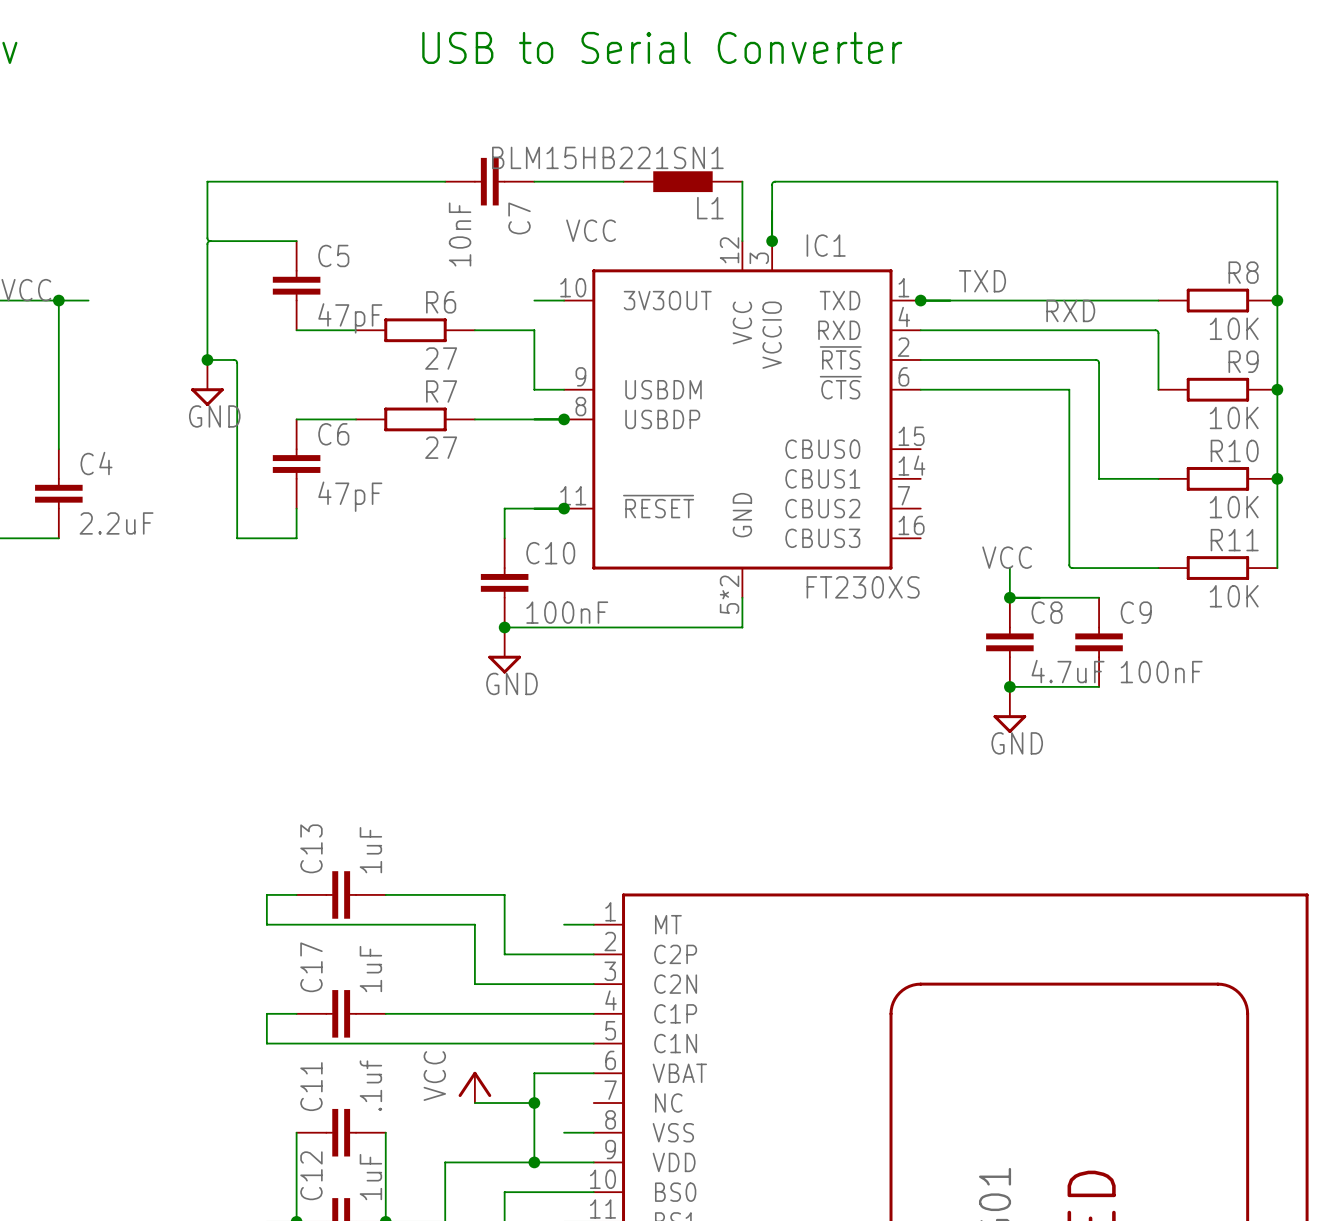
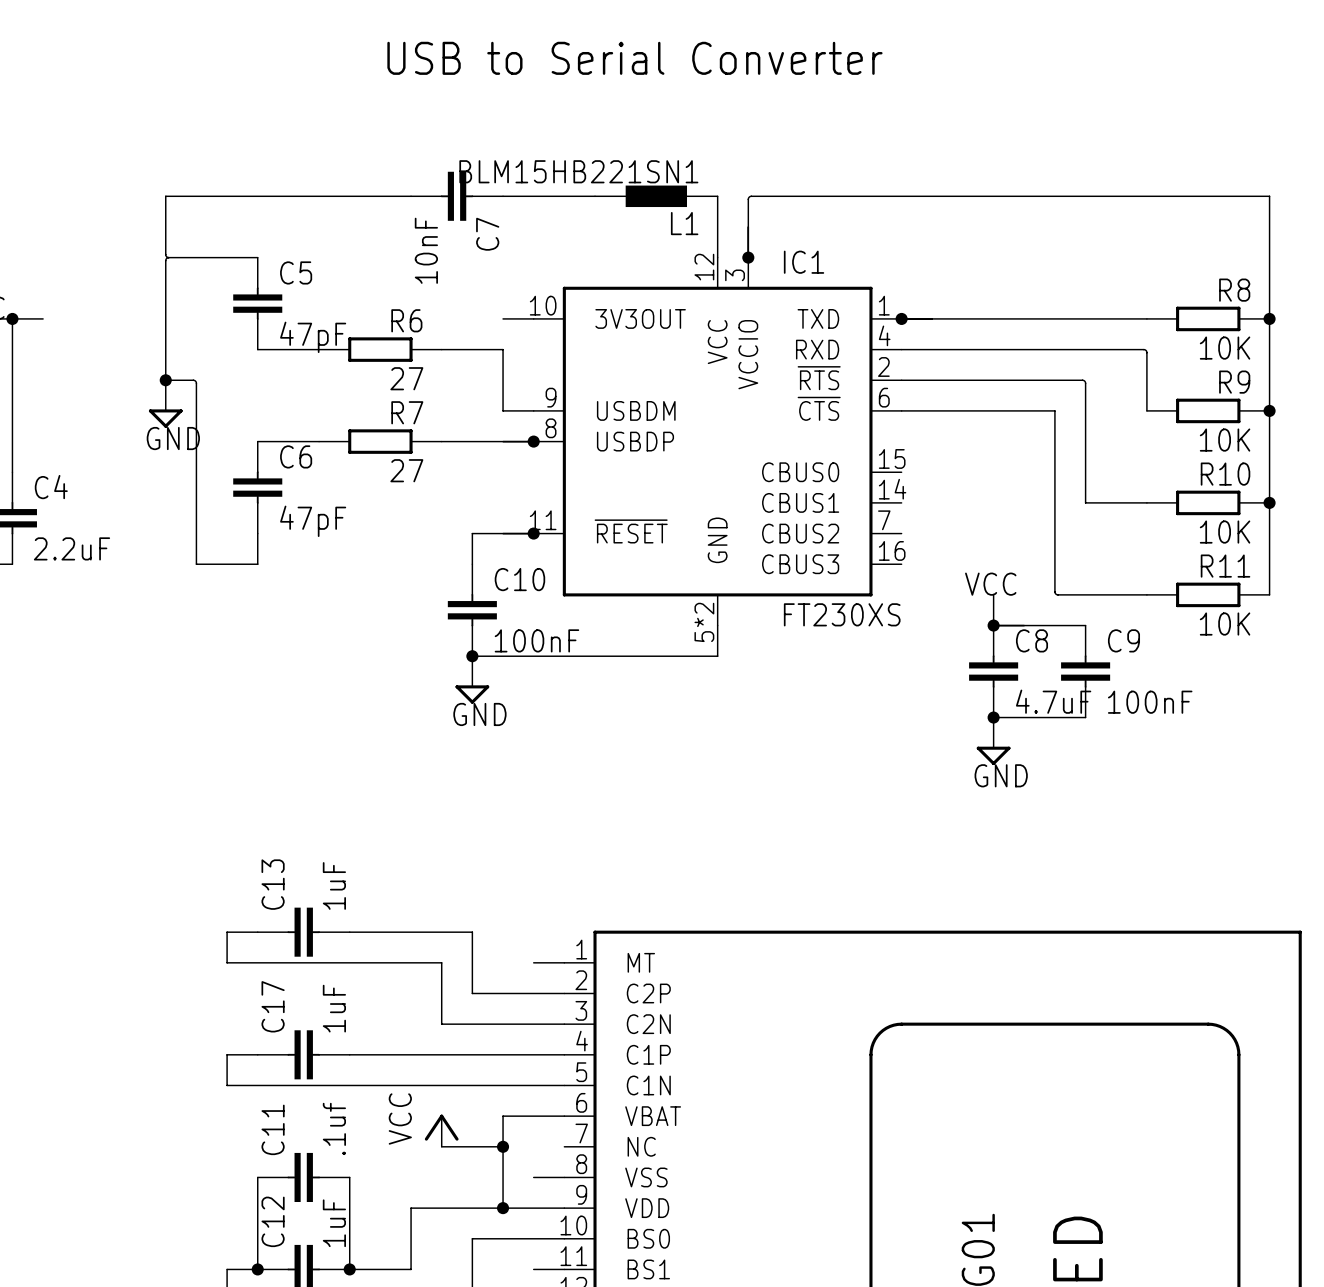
label: VCC (591, 230) -> none
label: TXD (982, 281) -> none
label: RXD (1070, 310) -> none

